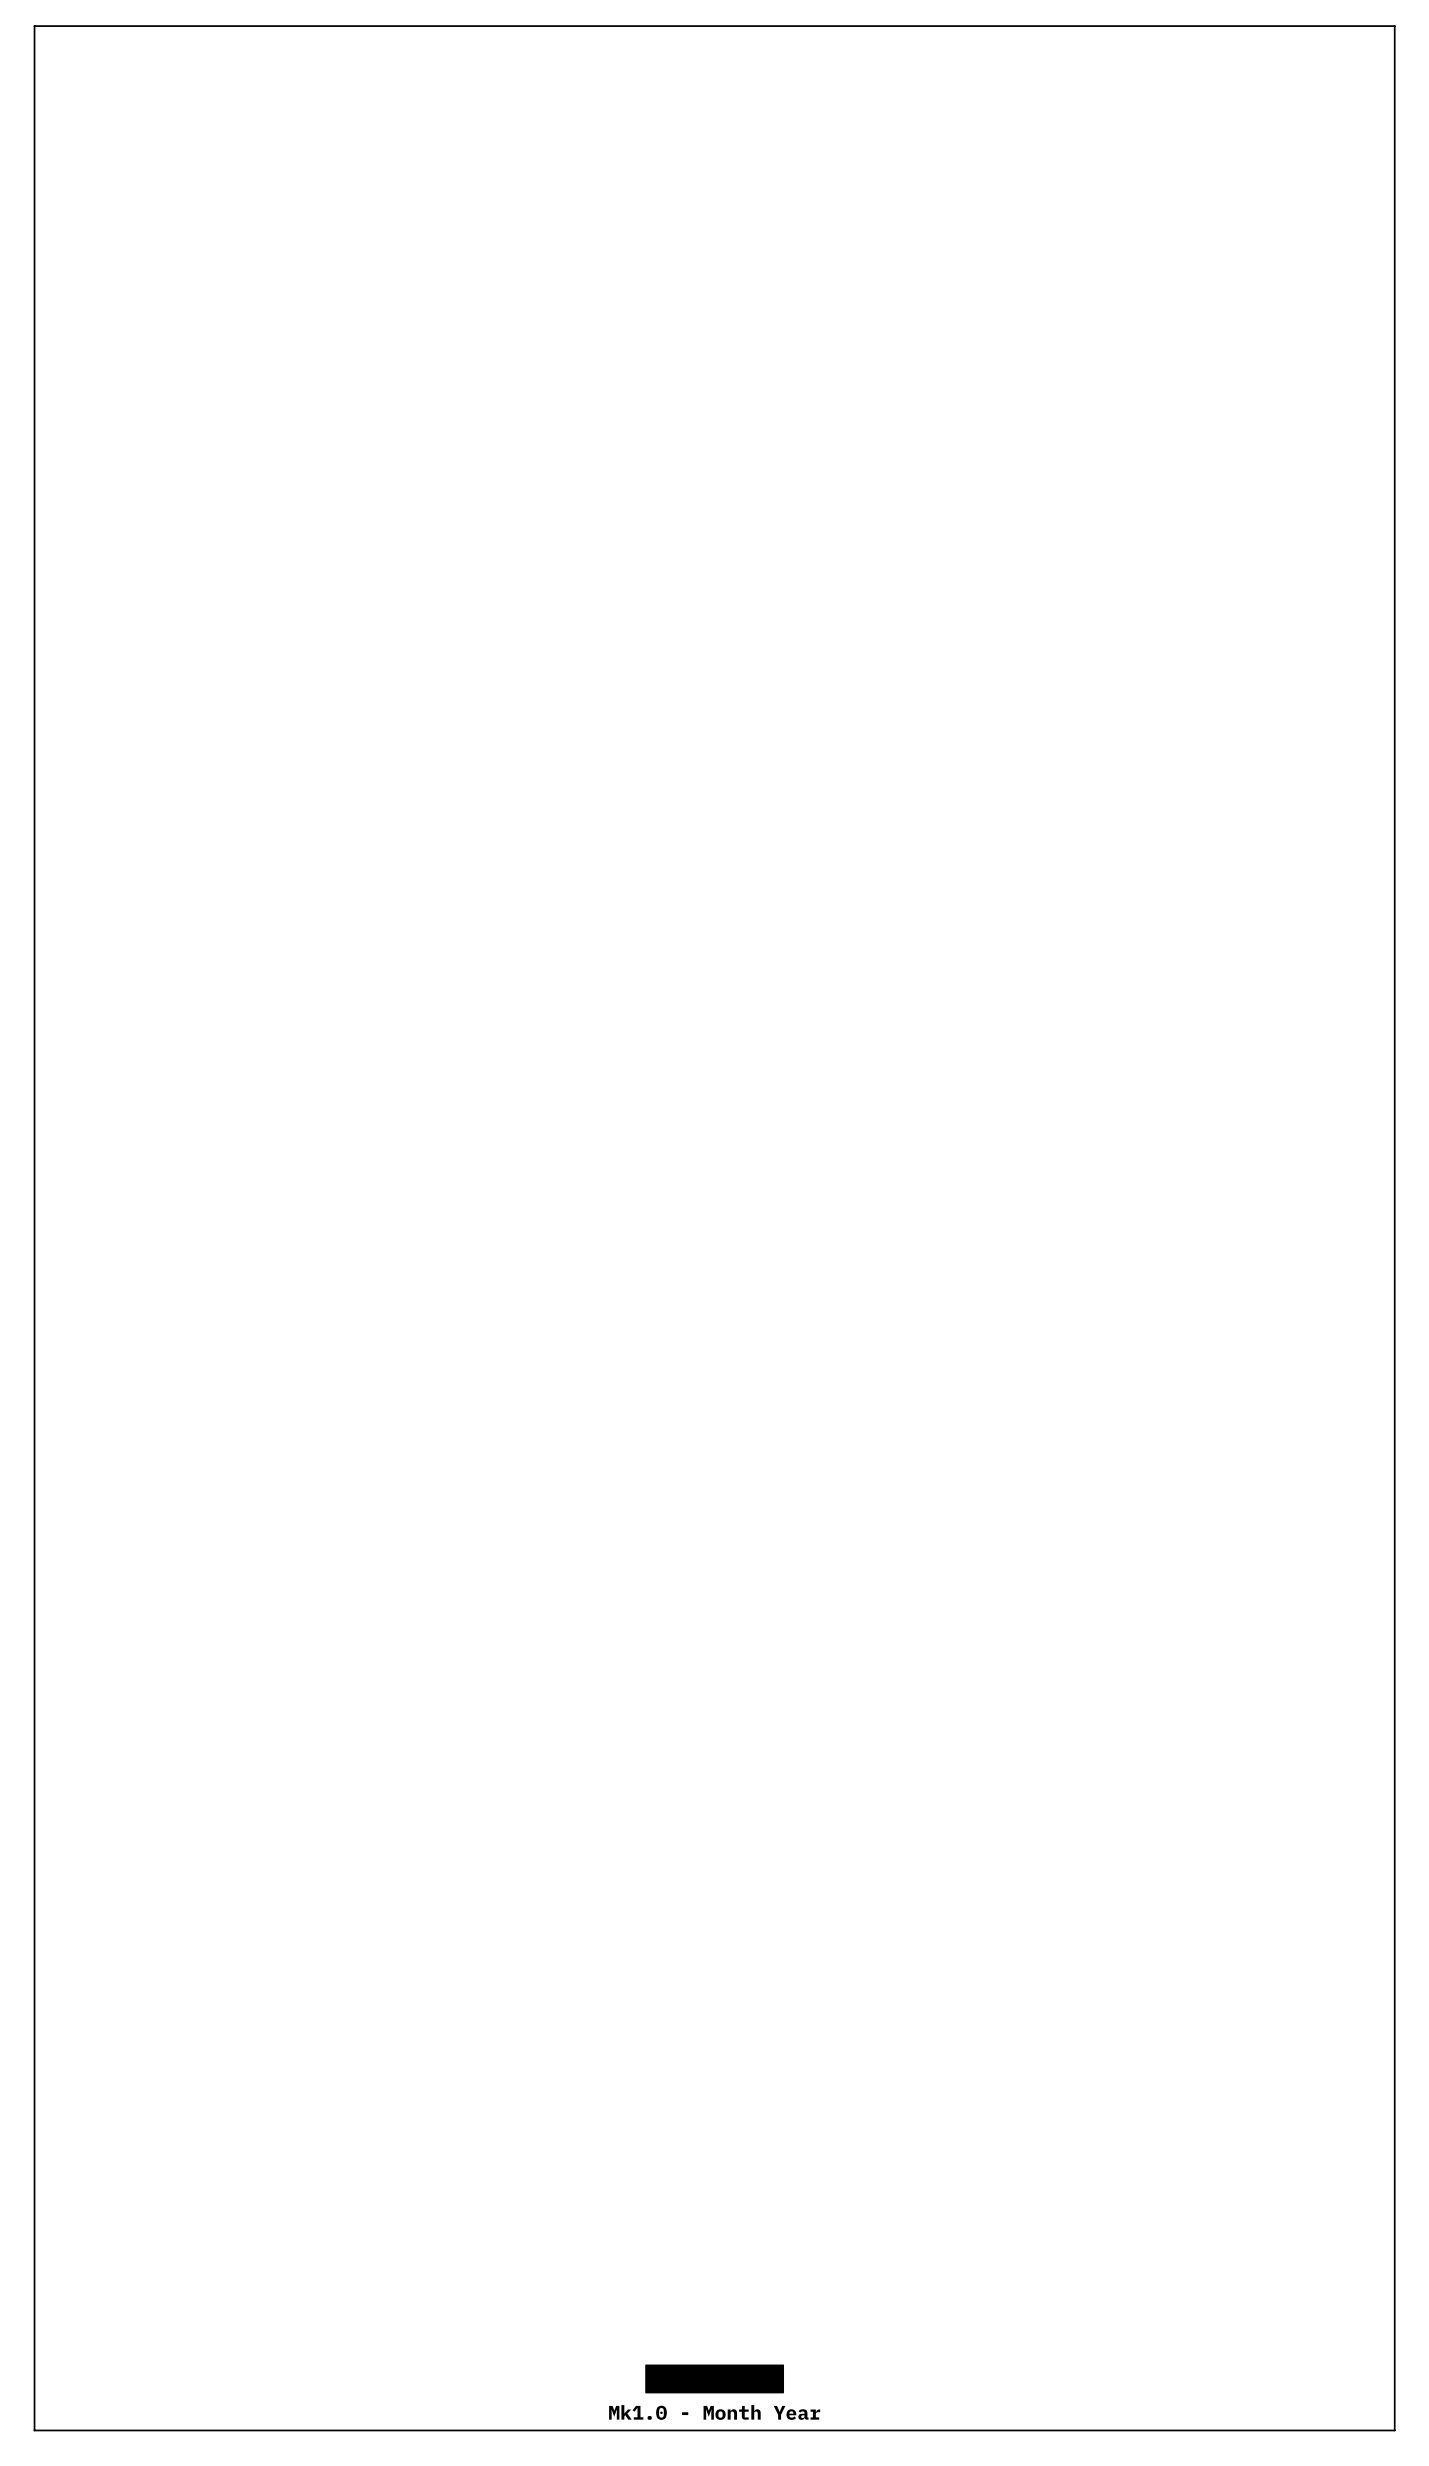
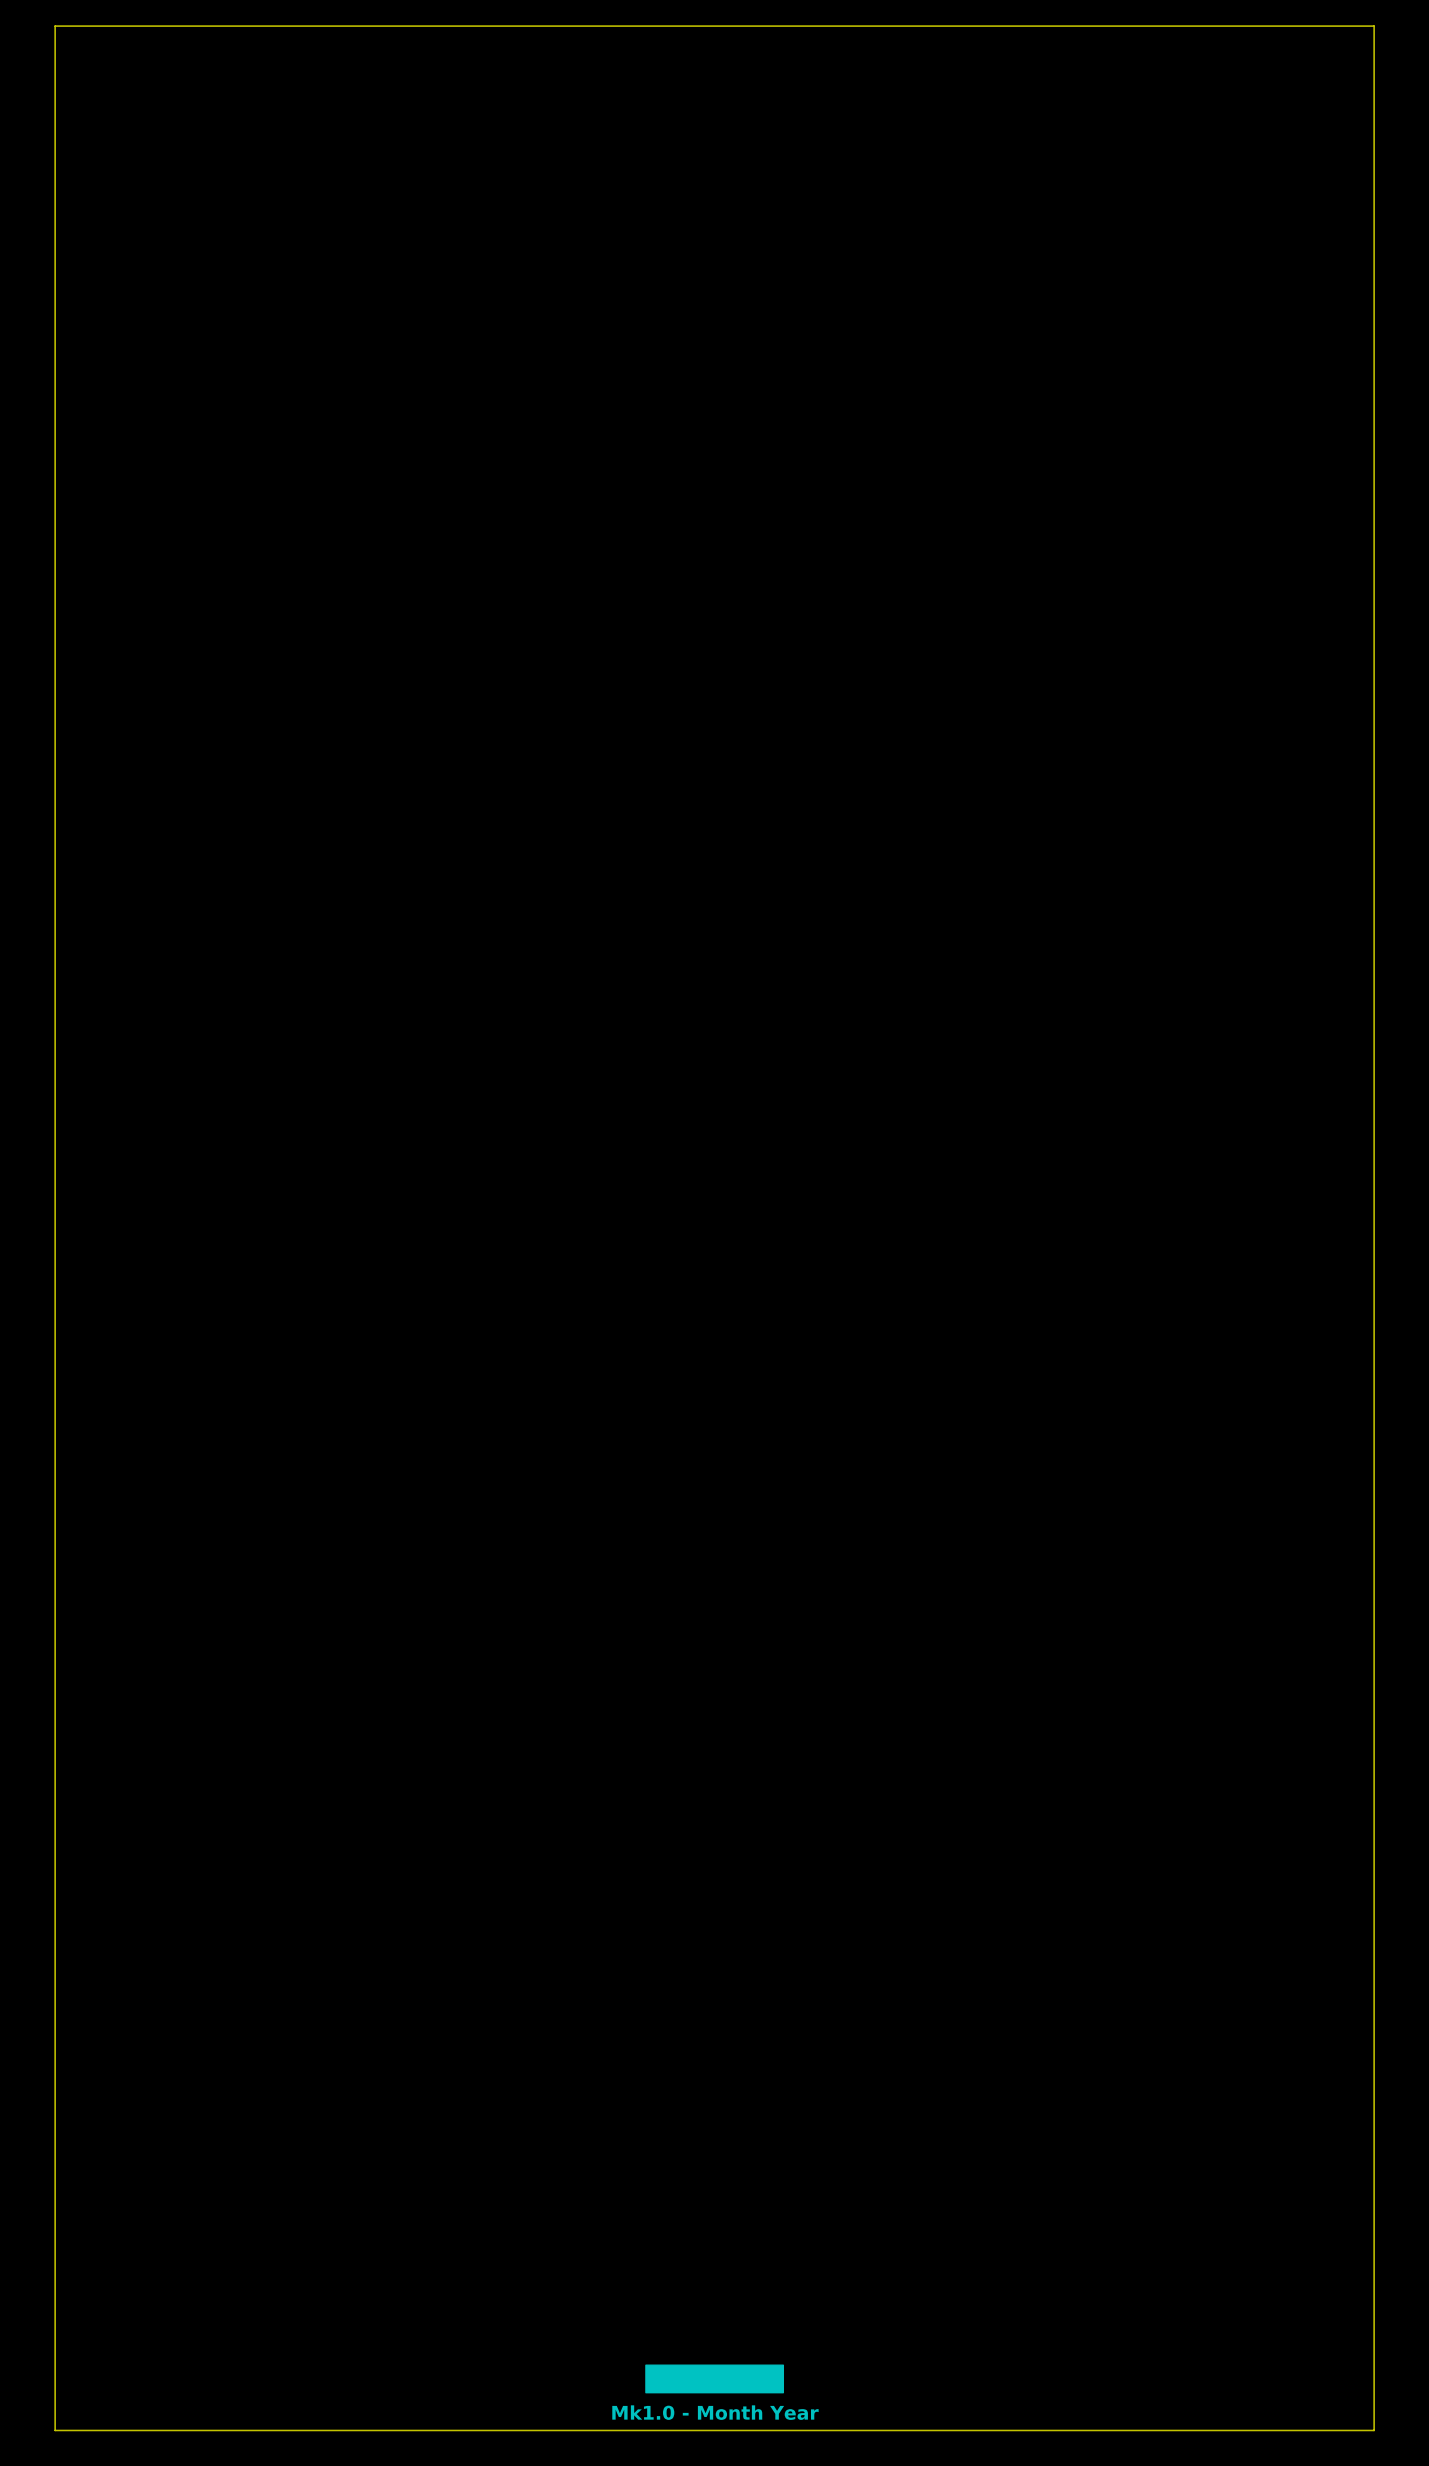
board edge: (55, 26) (34, 26) (34, 2430) (55, 2430) -> (55, 26) (55, 2430)
board edge: (1374, 26) (1394, 26) (1394, 2430) (1374, 2430) -> (1374, 26) (1374, 2430)

